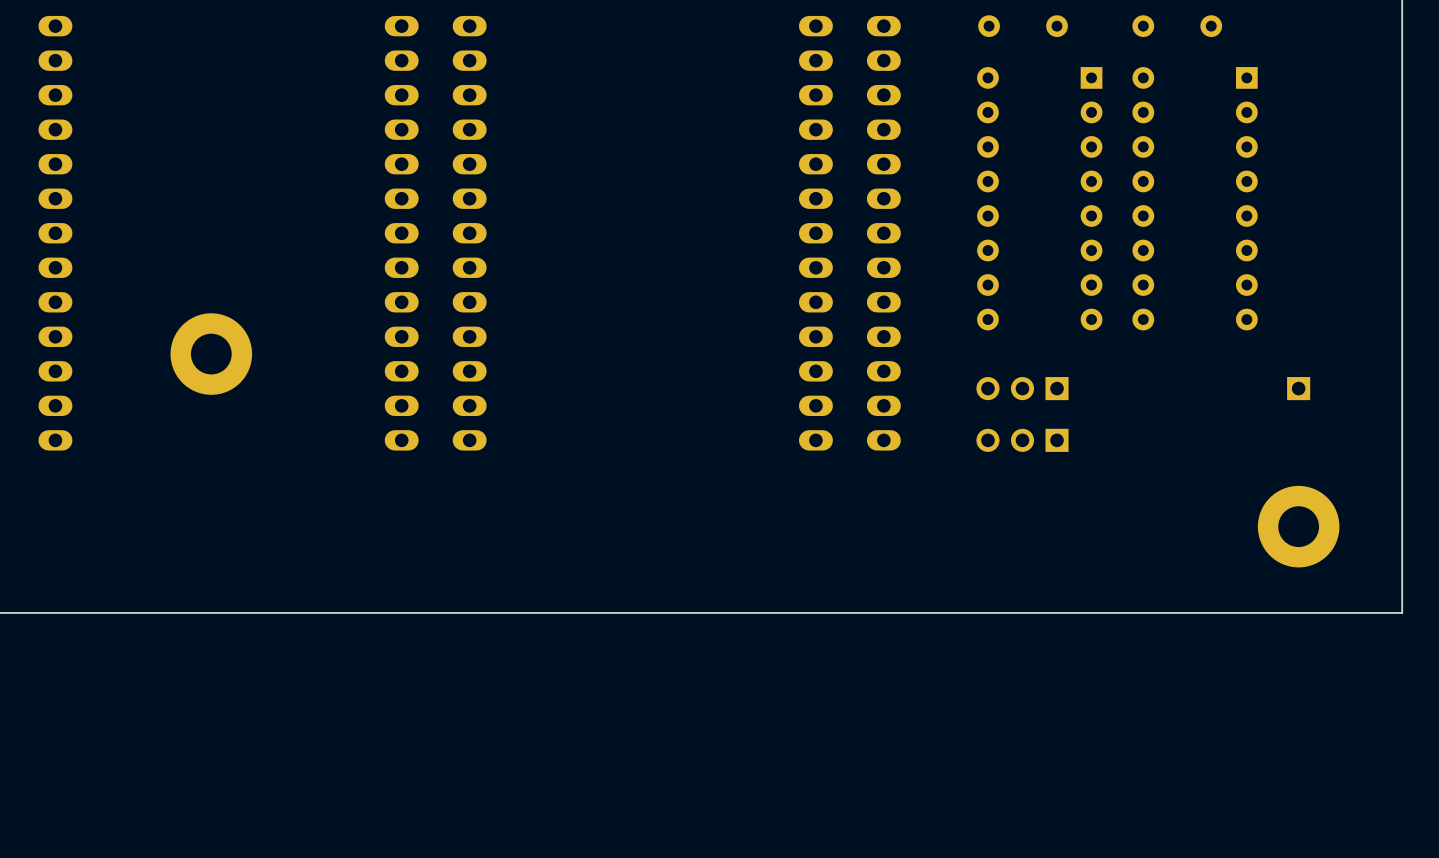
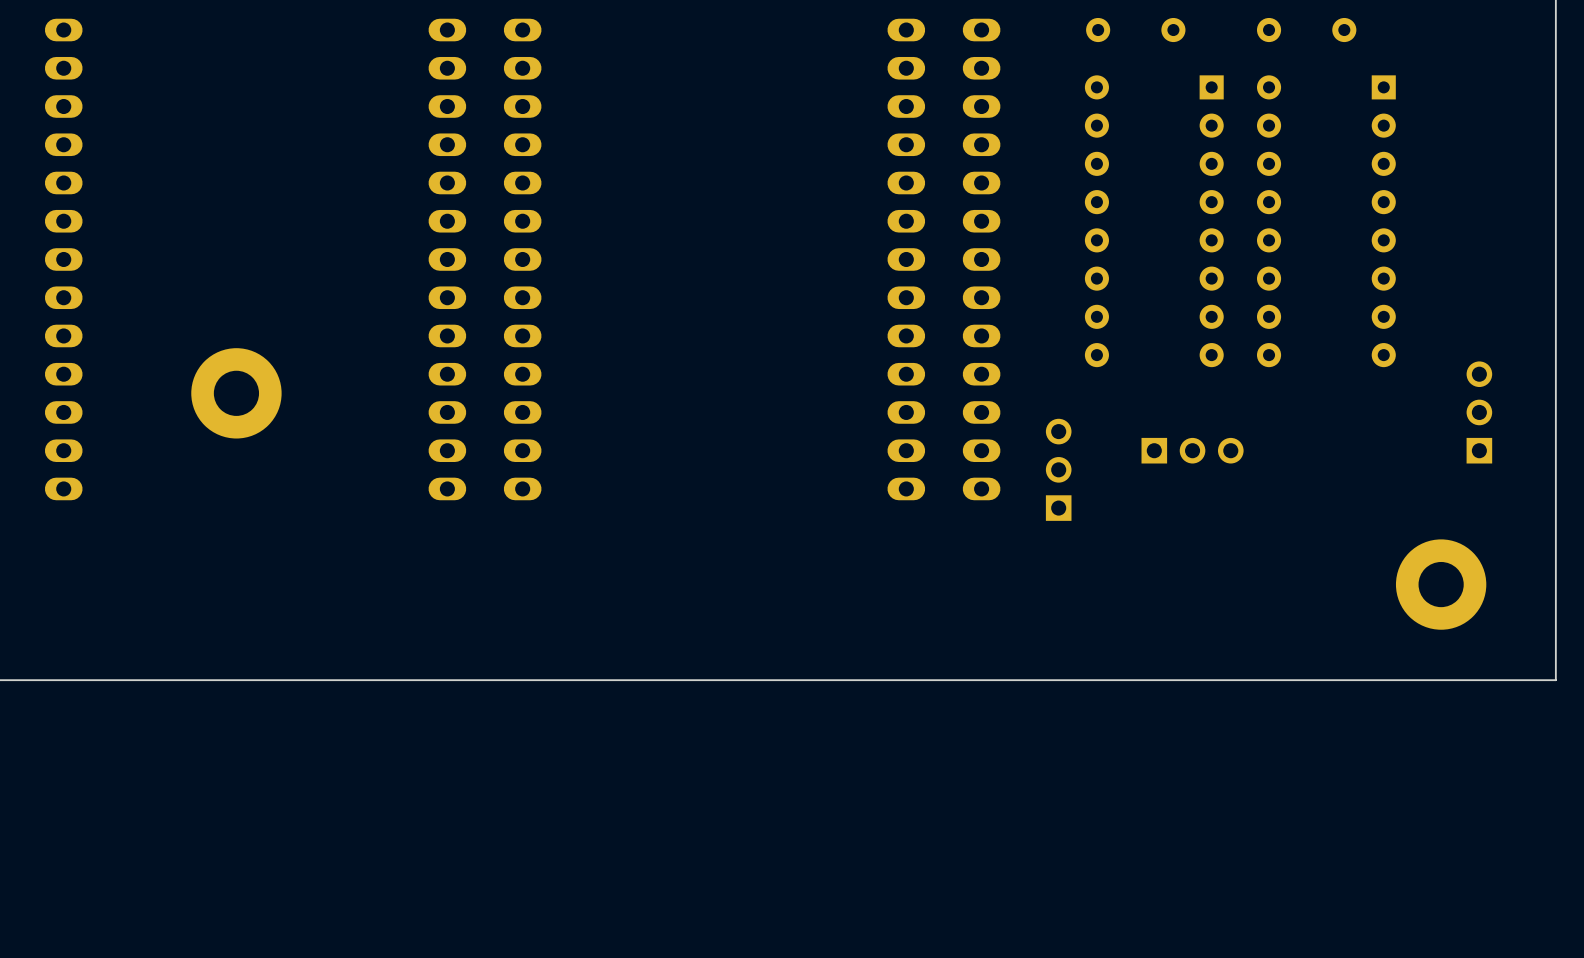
part: none -> (1479, 412)
part: (1022, 388) -> none
part: (1298, 388) -> none
part: none -> (1192, 450)
part: none -> (1058, 469)
part: (1022, 440) -> none

